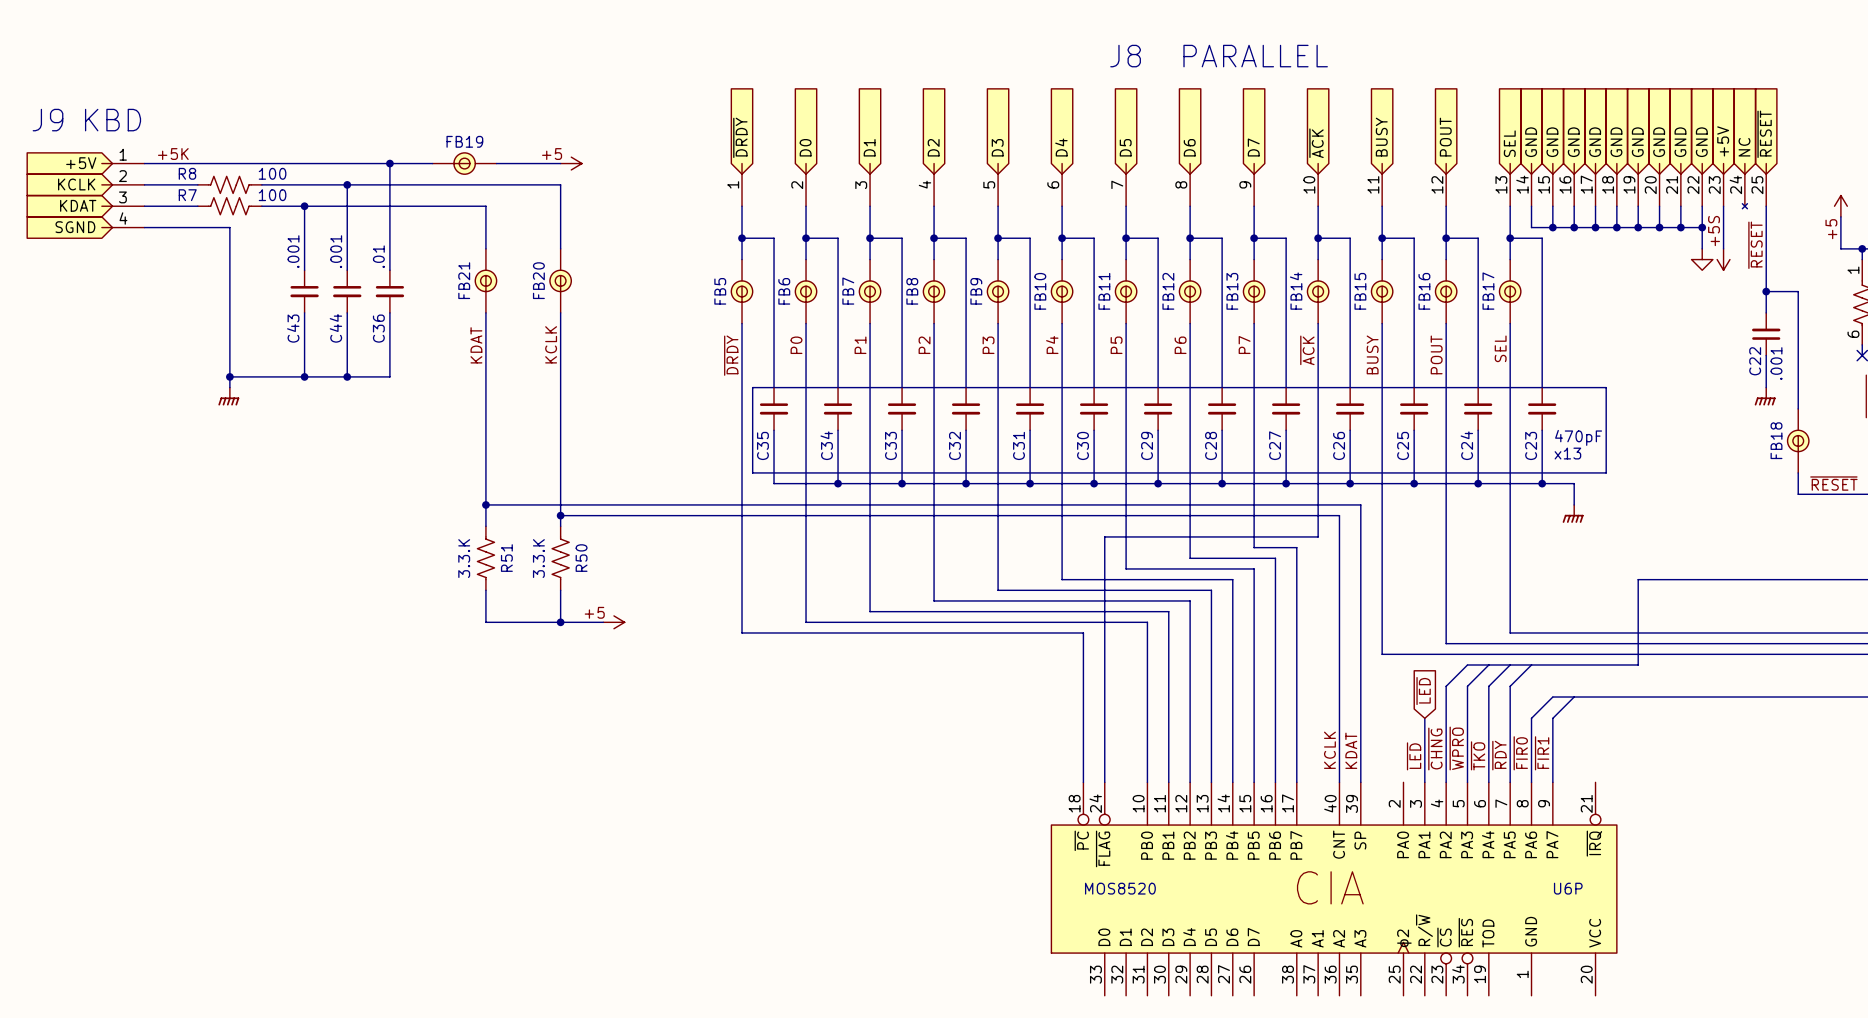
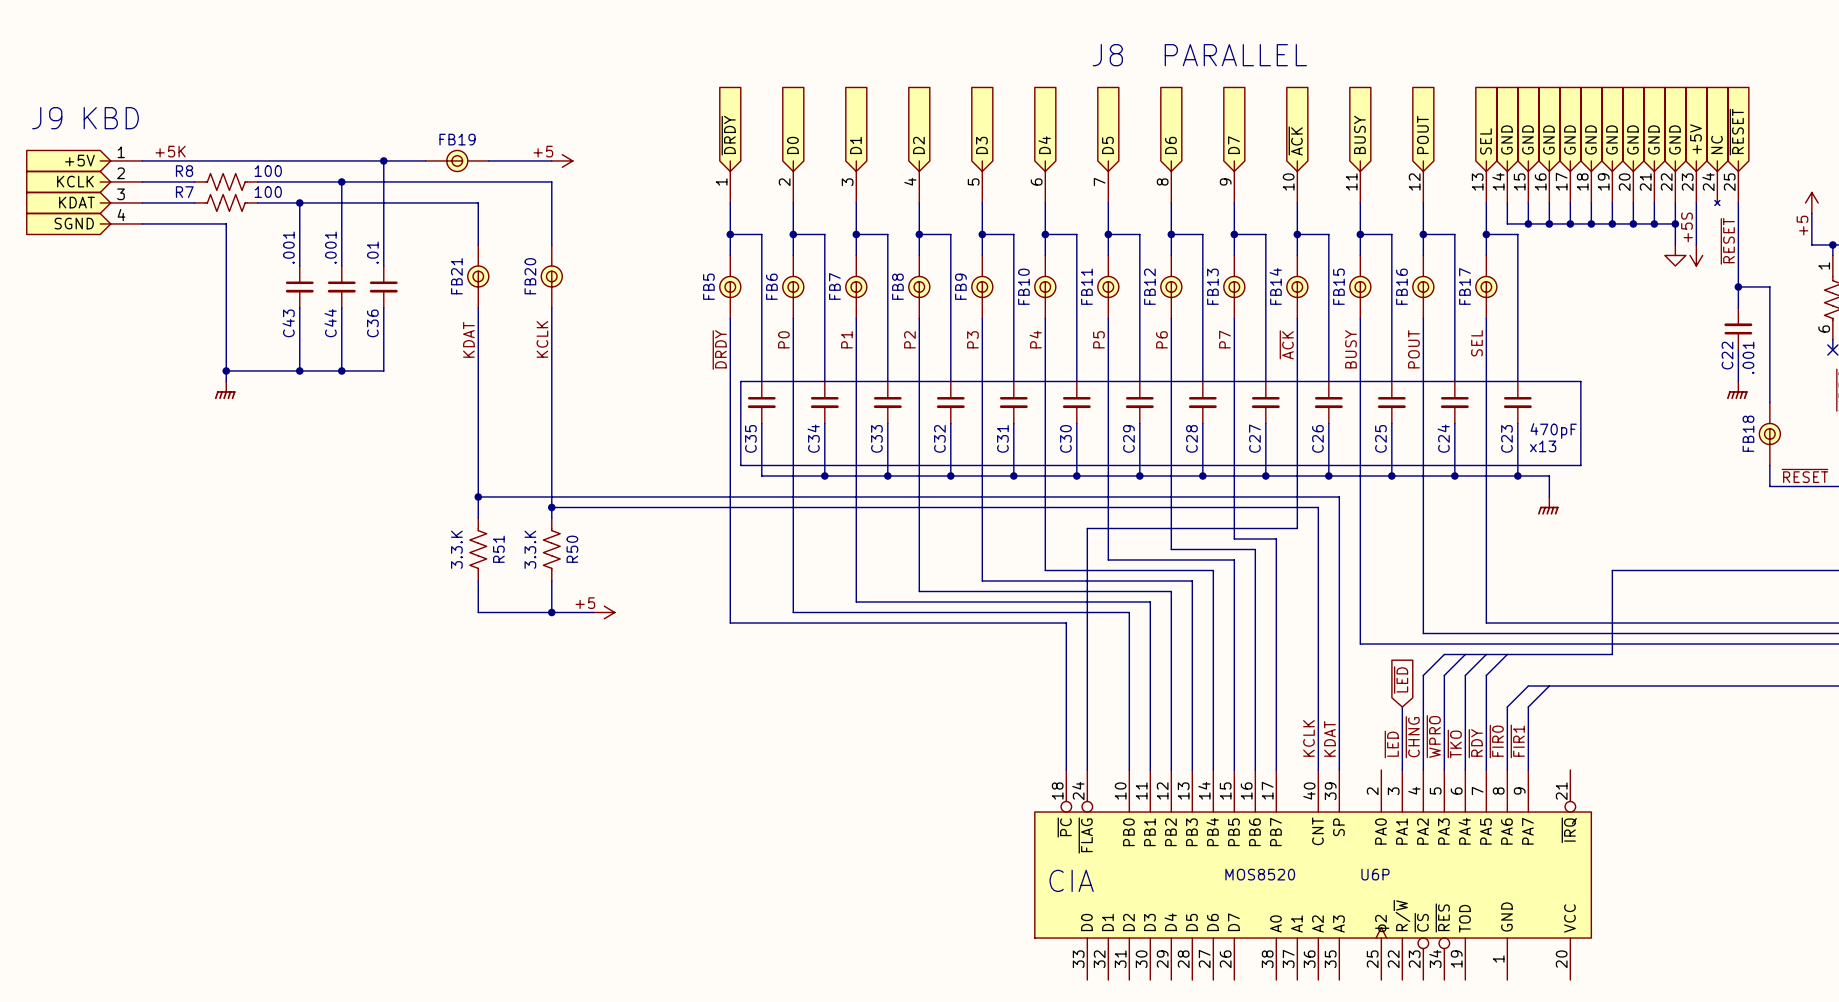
U6P text: CIA (1330, 887) -> none
U6P value position: MOS8520 (1120, 888) -> MOS8520 (1260, 874)
U6P name position: U6P (1568, 888) -> U6P (1375, 874)
text: none -> CIA (1071, 880)

